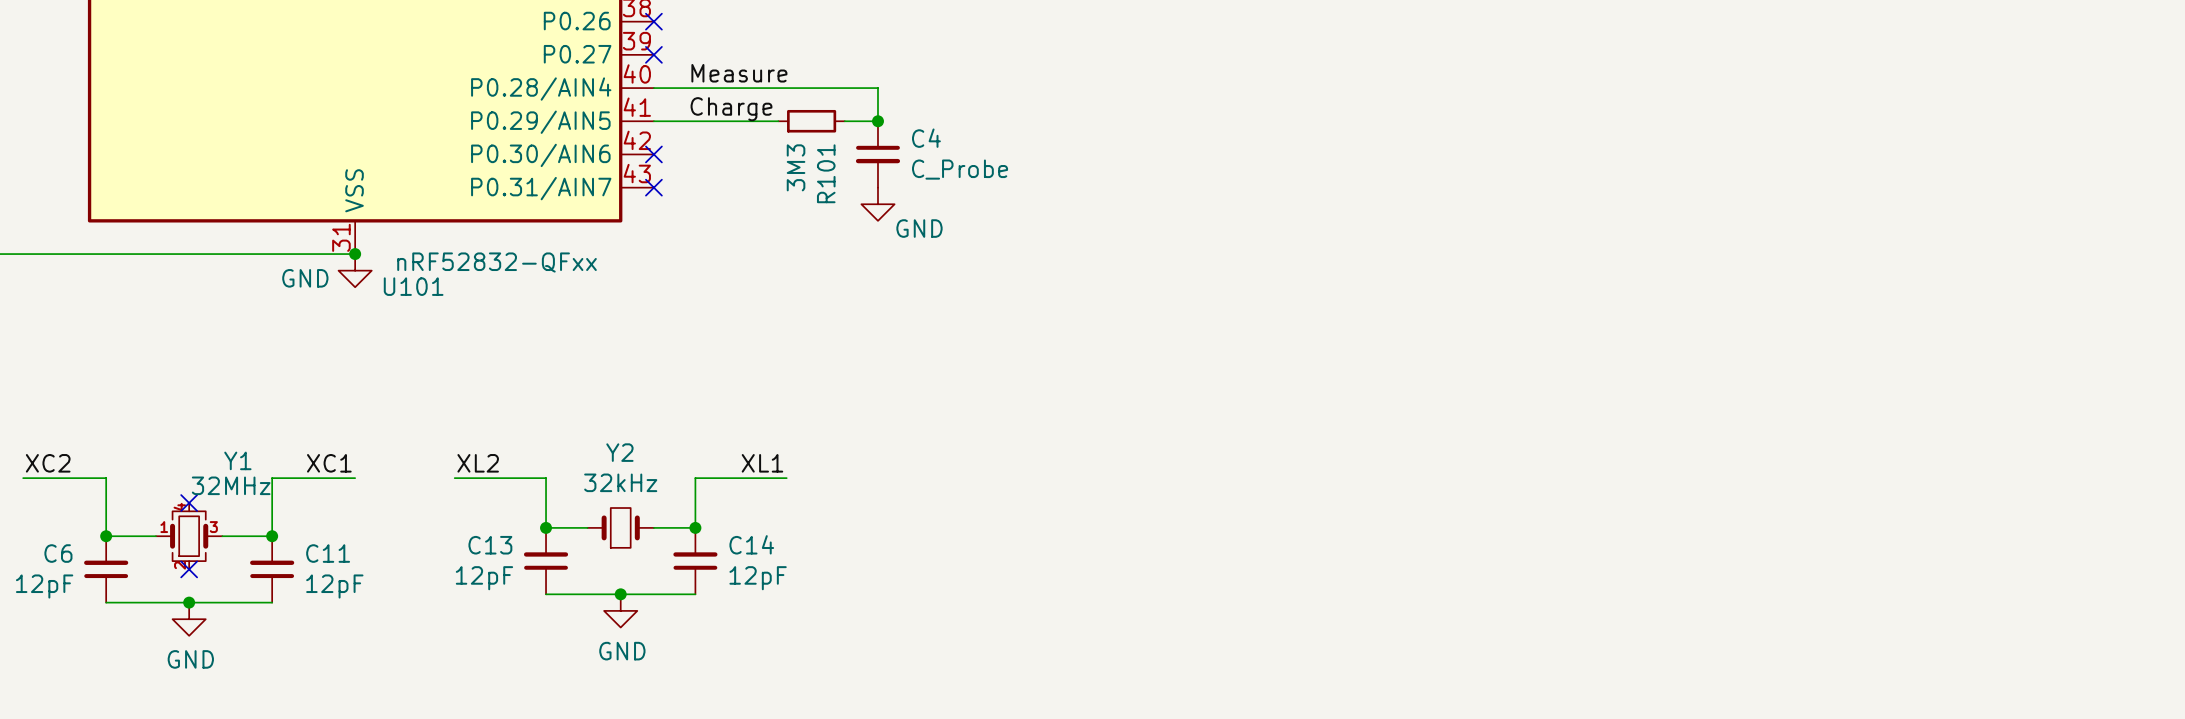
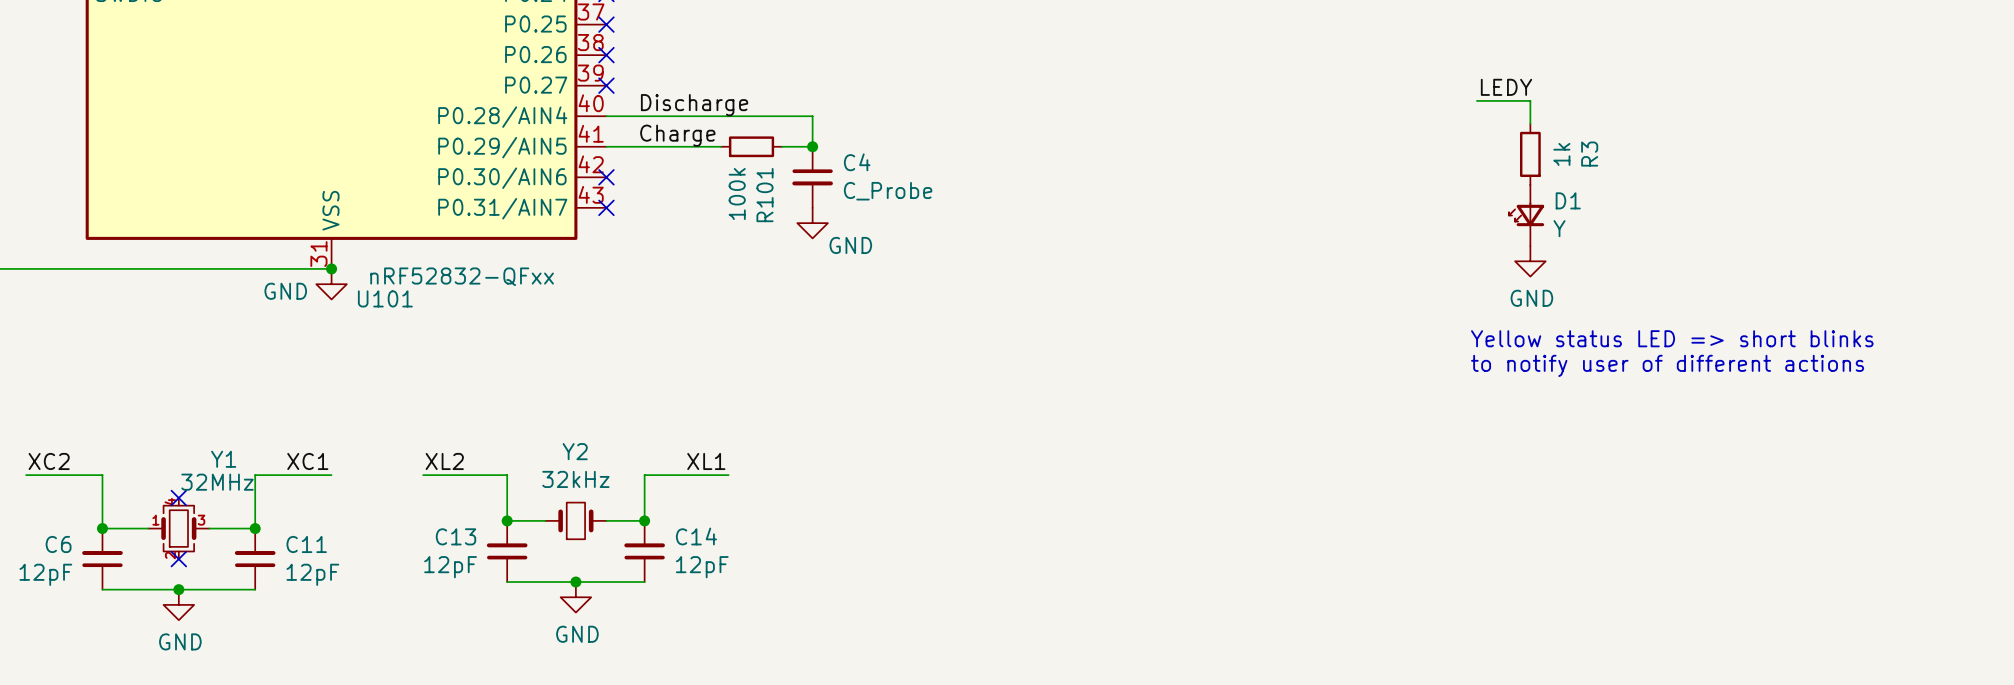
label: none -> LEDY (1506, 87)
wire: none -> (1476, 100) (1530, 100) (1530, 123)
label: Measure (739, 73) -> Discharge (694, 105)
R3: none -> 1k (1530, 154)
R101 value: 3M3 (796, 167) -> 100k (737, 193)
D1: none -> Y (1526, 215)
power symbol: none -> GND (1530, 261)
text: none -> Yellow status LED => short blinks (1672, 338)
text: none -> to notify user of different actions (1667, 365)

